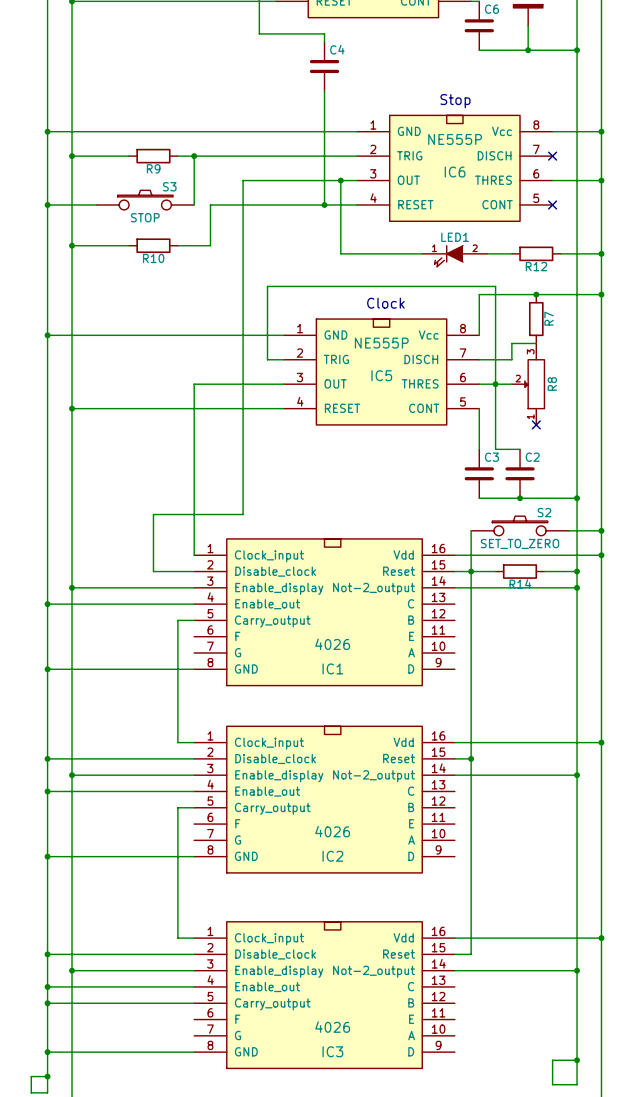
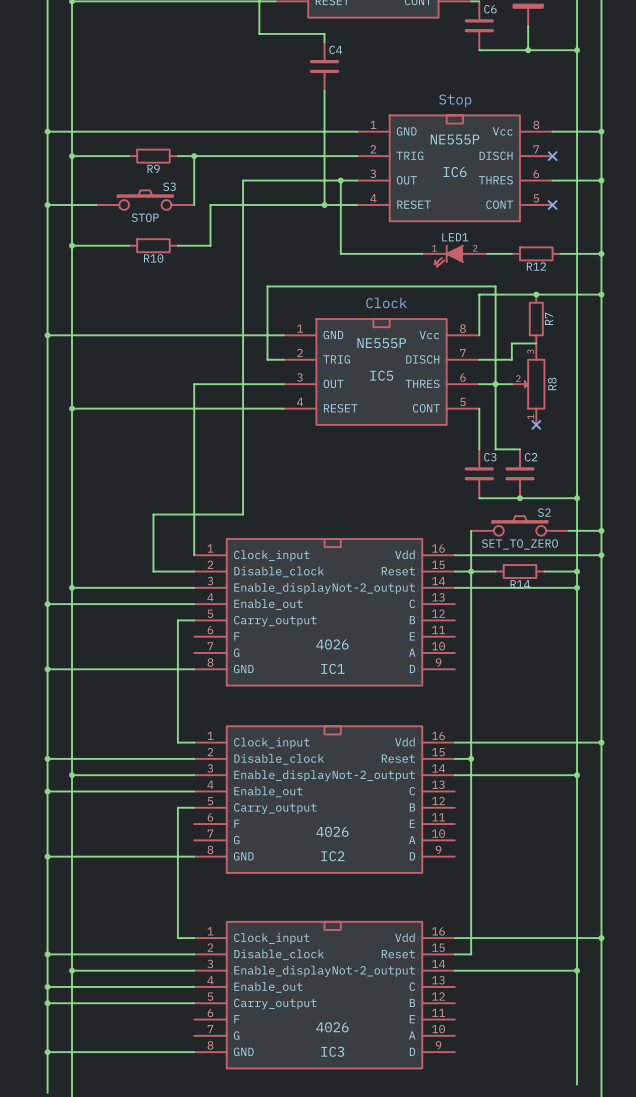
wire: (577, 1060) (552, 1060) (552, 1084) (577, 1084) -> none
junction: (577, 1060) -> none
wire: (47, 1076) (31, 1076) (31, 1092) (47, 1092) -> none
junction: (47, 1076) -> none

